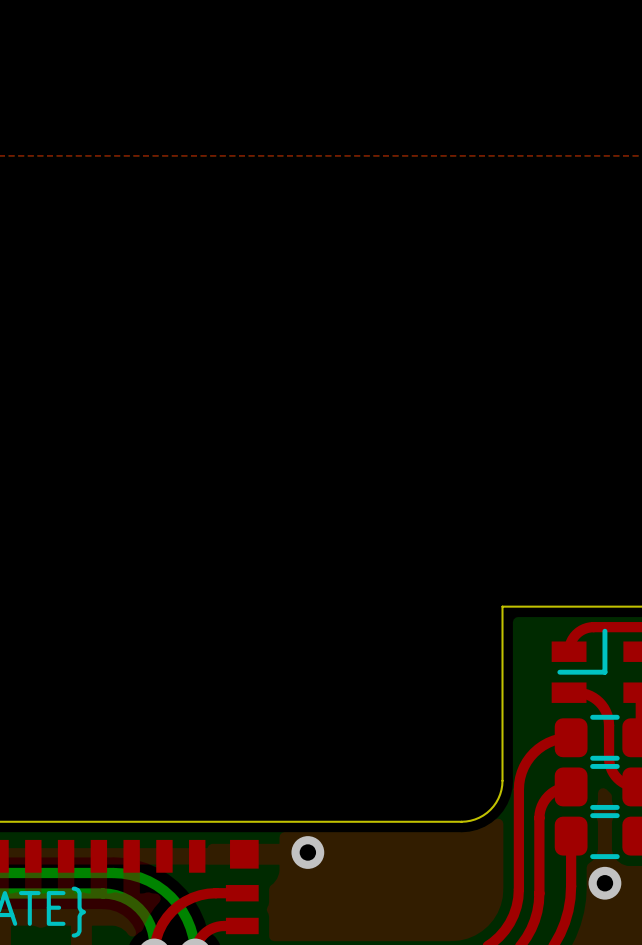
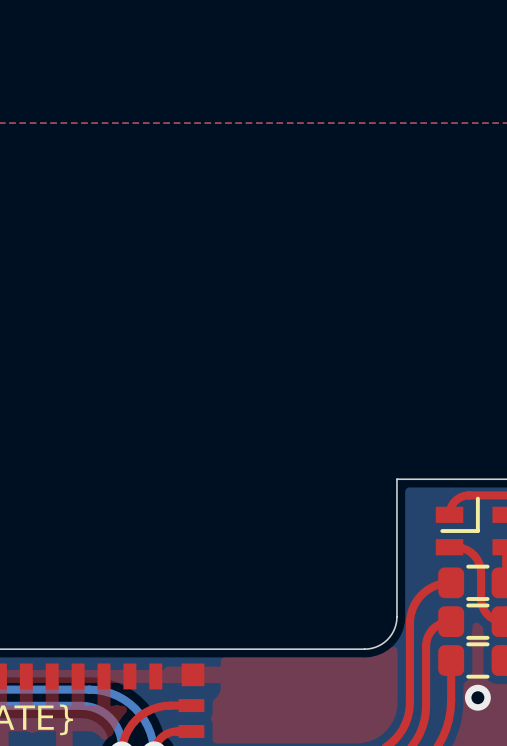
via: (307, 852) -> none

